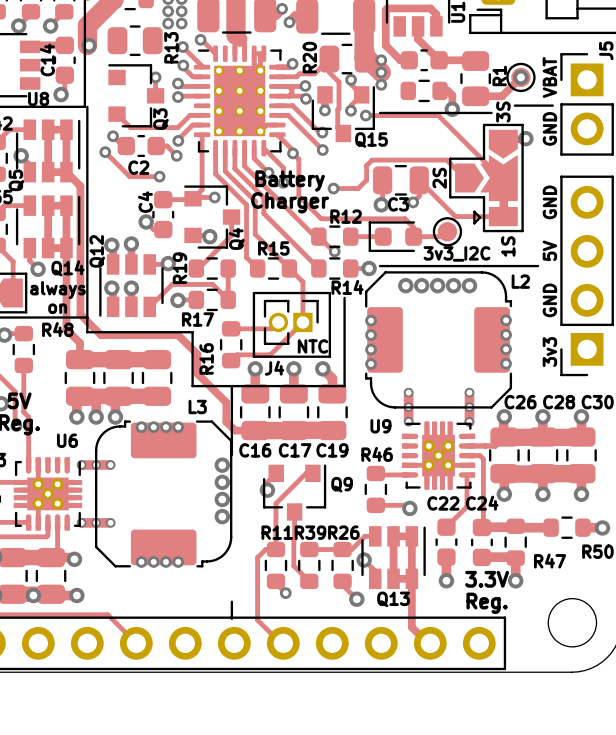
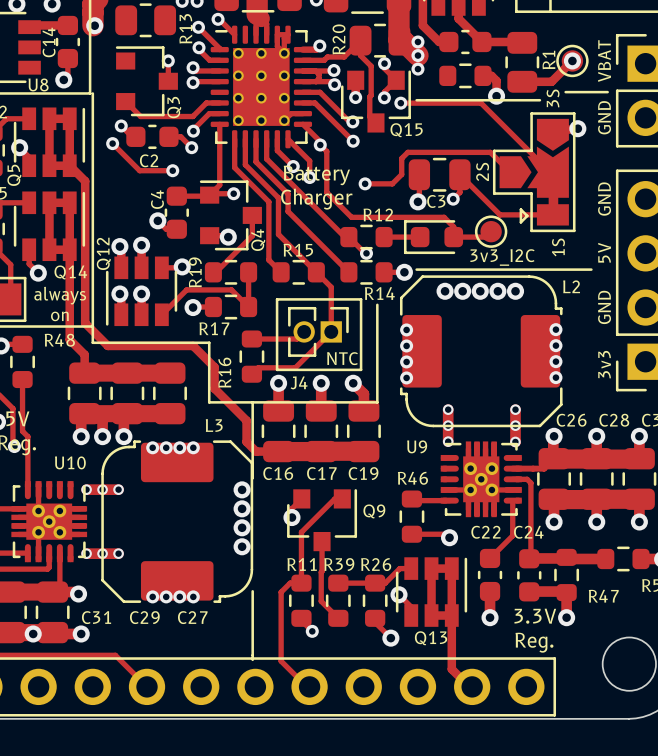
U6 name: U6 (67, 440) -> U10 (70, 462)
line: none -> (252, 591) (252, 640)
C31 name: none -> C31 (96, 617)
C29 name: none -> C29 (144, 617)
C27 name: none -> C27 (192, 617)

